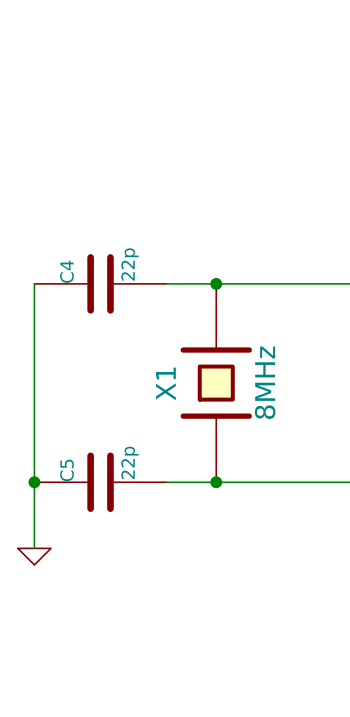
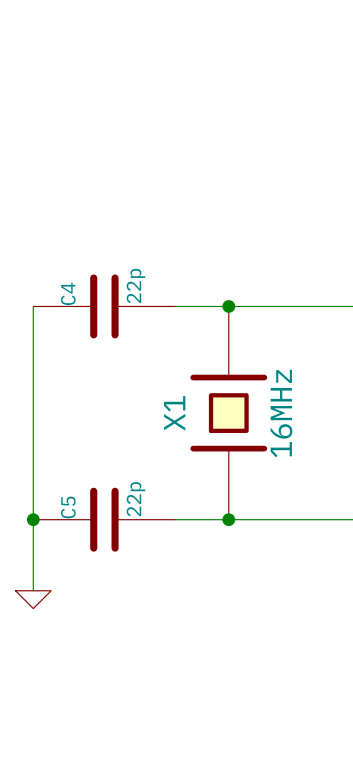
X1 value: 8MHz (265, 382) -> 16MHz (281, 413)

